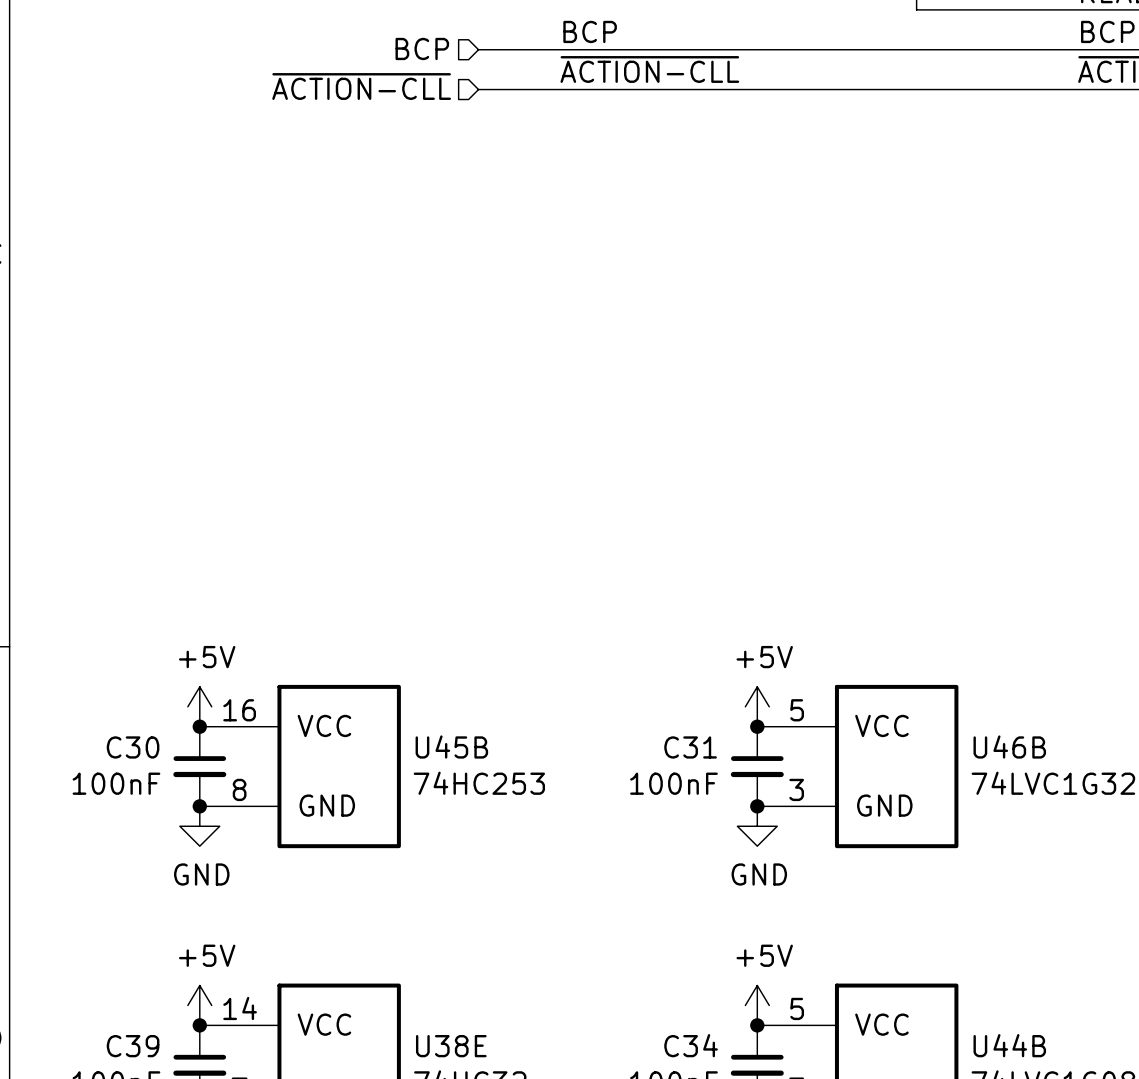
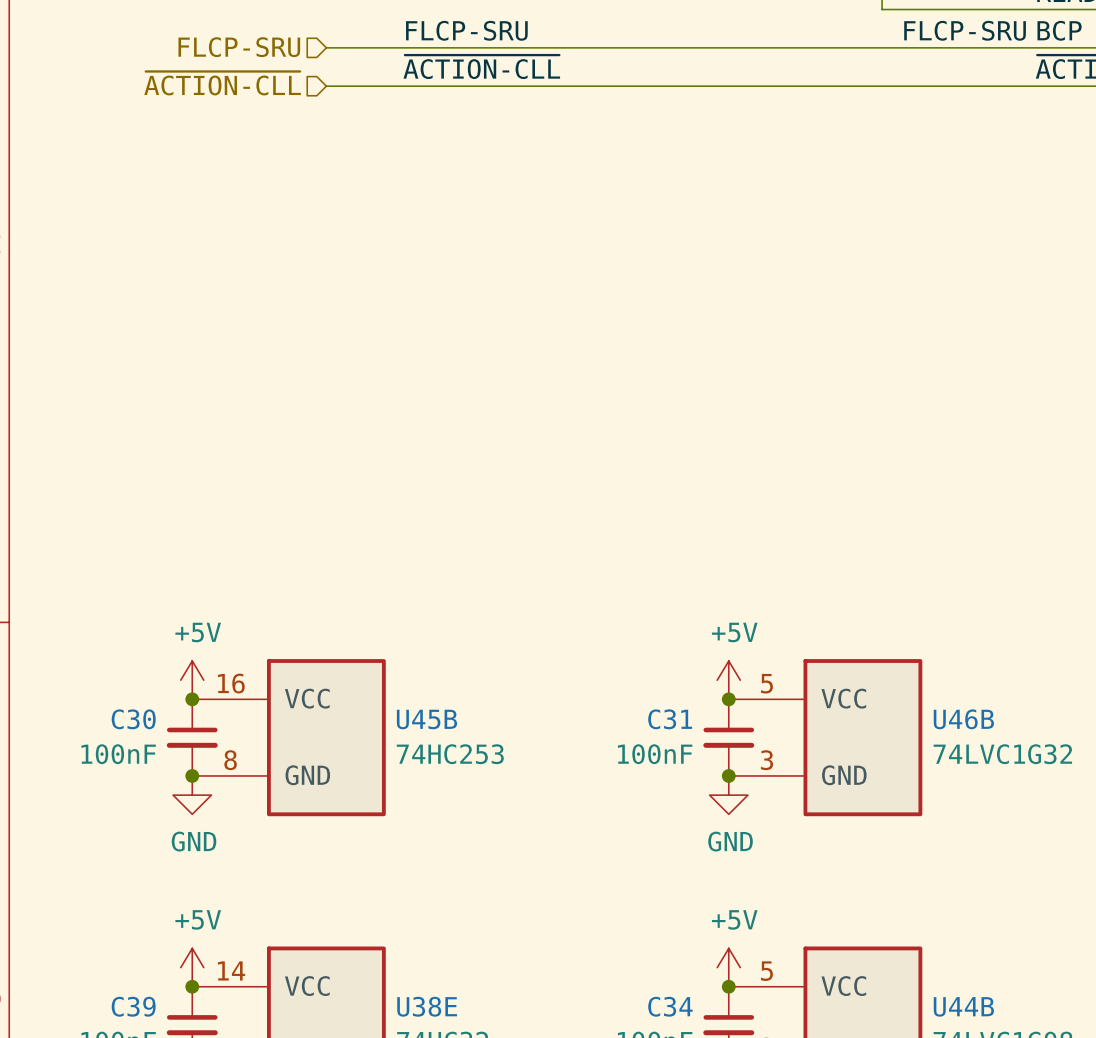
label: none -> FLCP-SRU (466, 30)
label: BCP (590, 31) -> none
label: none -> FLCP-SRU (965, 30)
hierarchical label: none -> FLCP-SRU (239, 47)
hierarchical label: BCP (422, 48) -> none
wire: none -> (326, 47) (460, 47)
label position: ~{ACTION-CLL} (649, 69) -> ~{ACTION-CLL} (481, 67)
hierarchical label position: ~{ACTION-CLL} (361, 86) -> ~{ACTION-CLL} (222, 83)
wire: none -> (326, 86) (460, 86)

